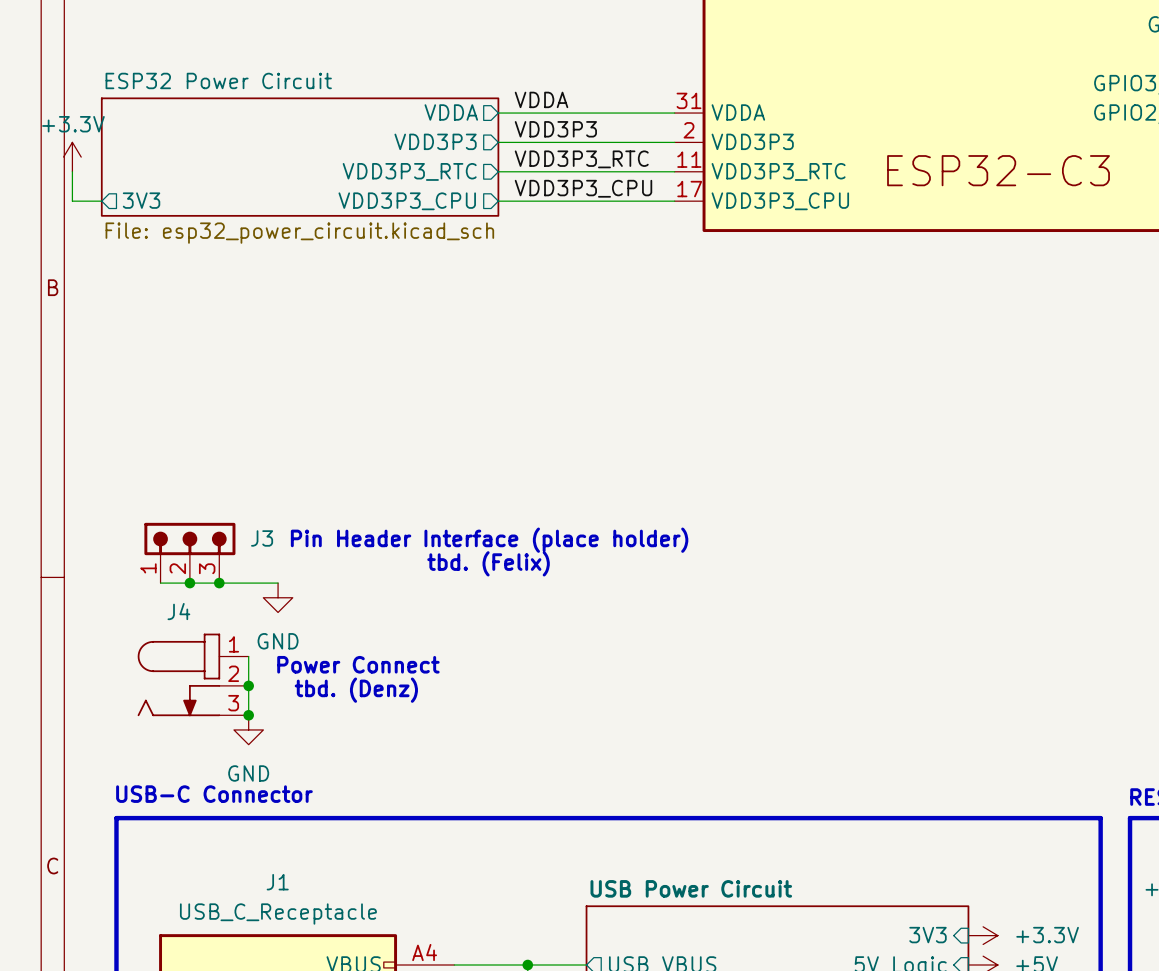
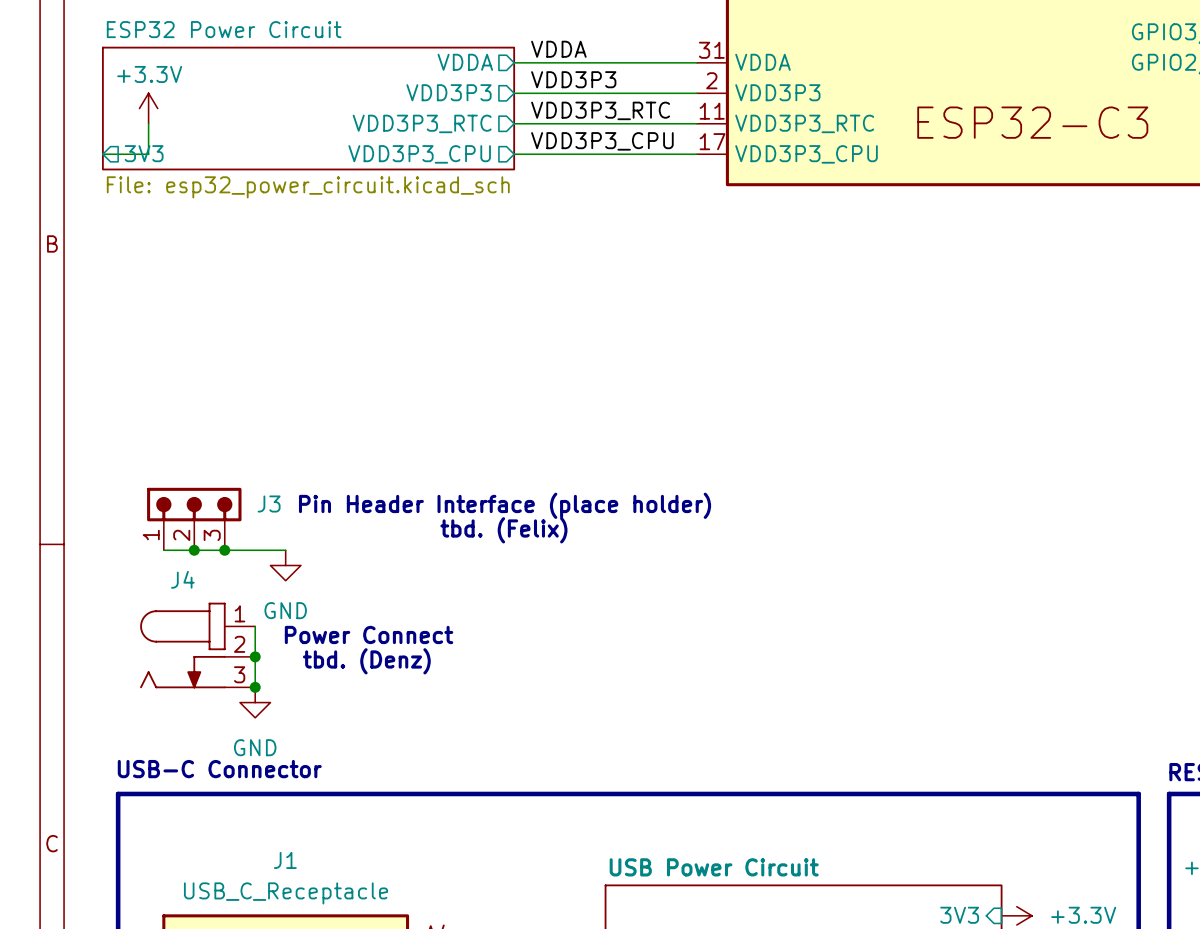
power symbol position: +3.3V (72, 157) -> +3.3V (148, 108)
wire: (72, 171) (72, 201) (101, 201) -> (148, 123) (148, 154) (102, 154)

